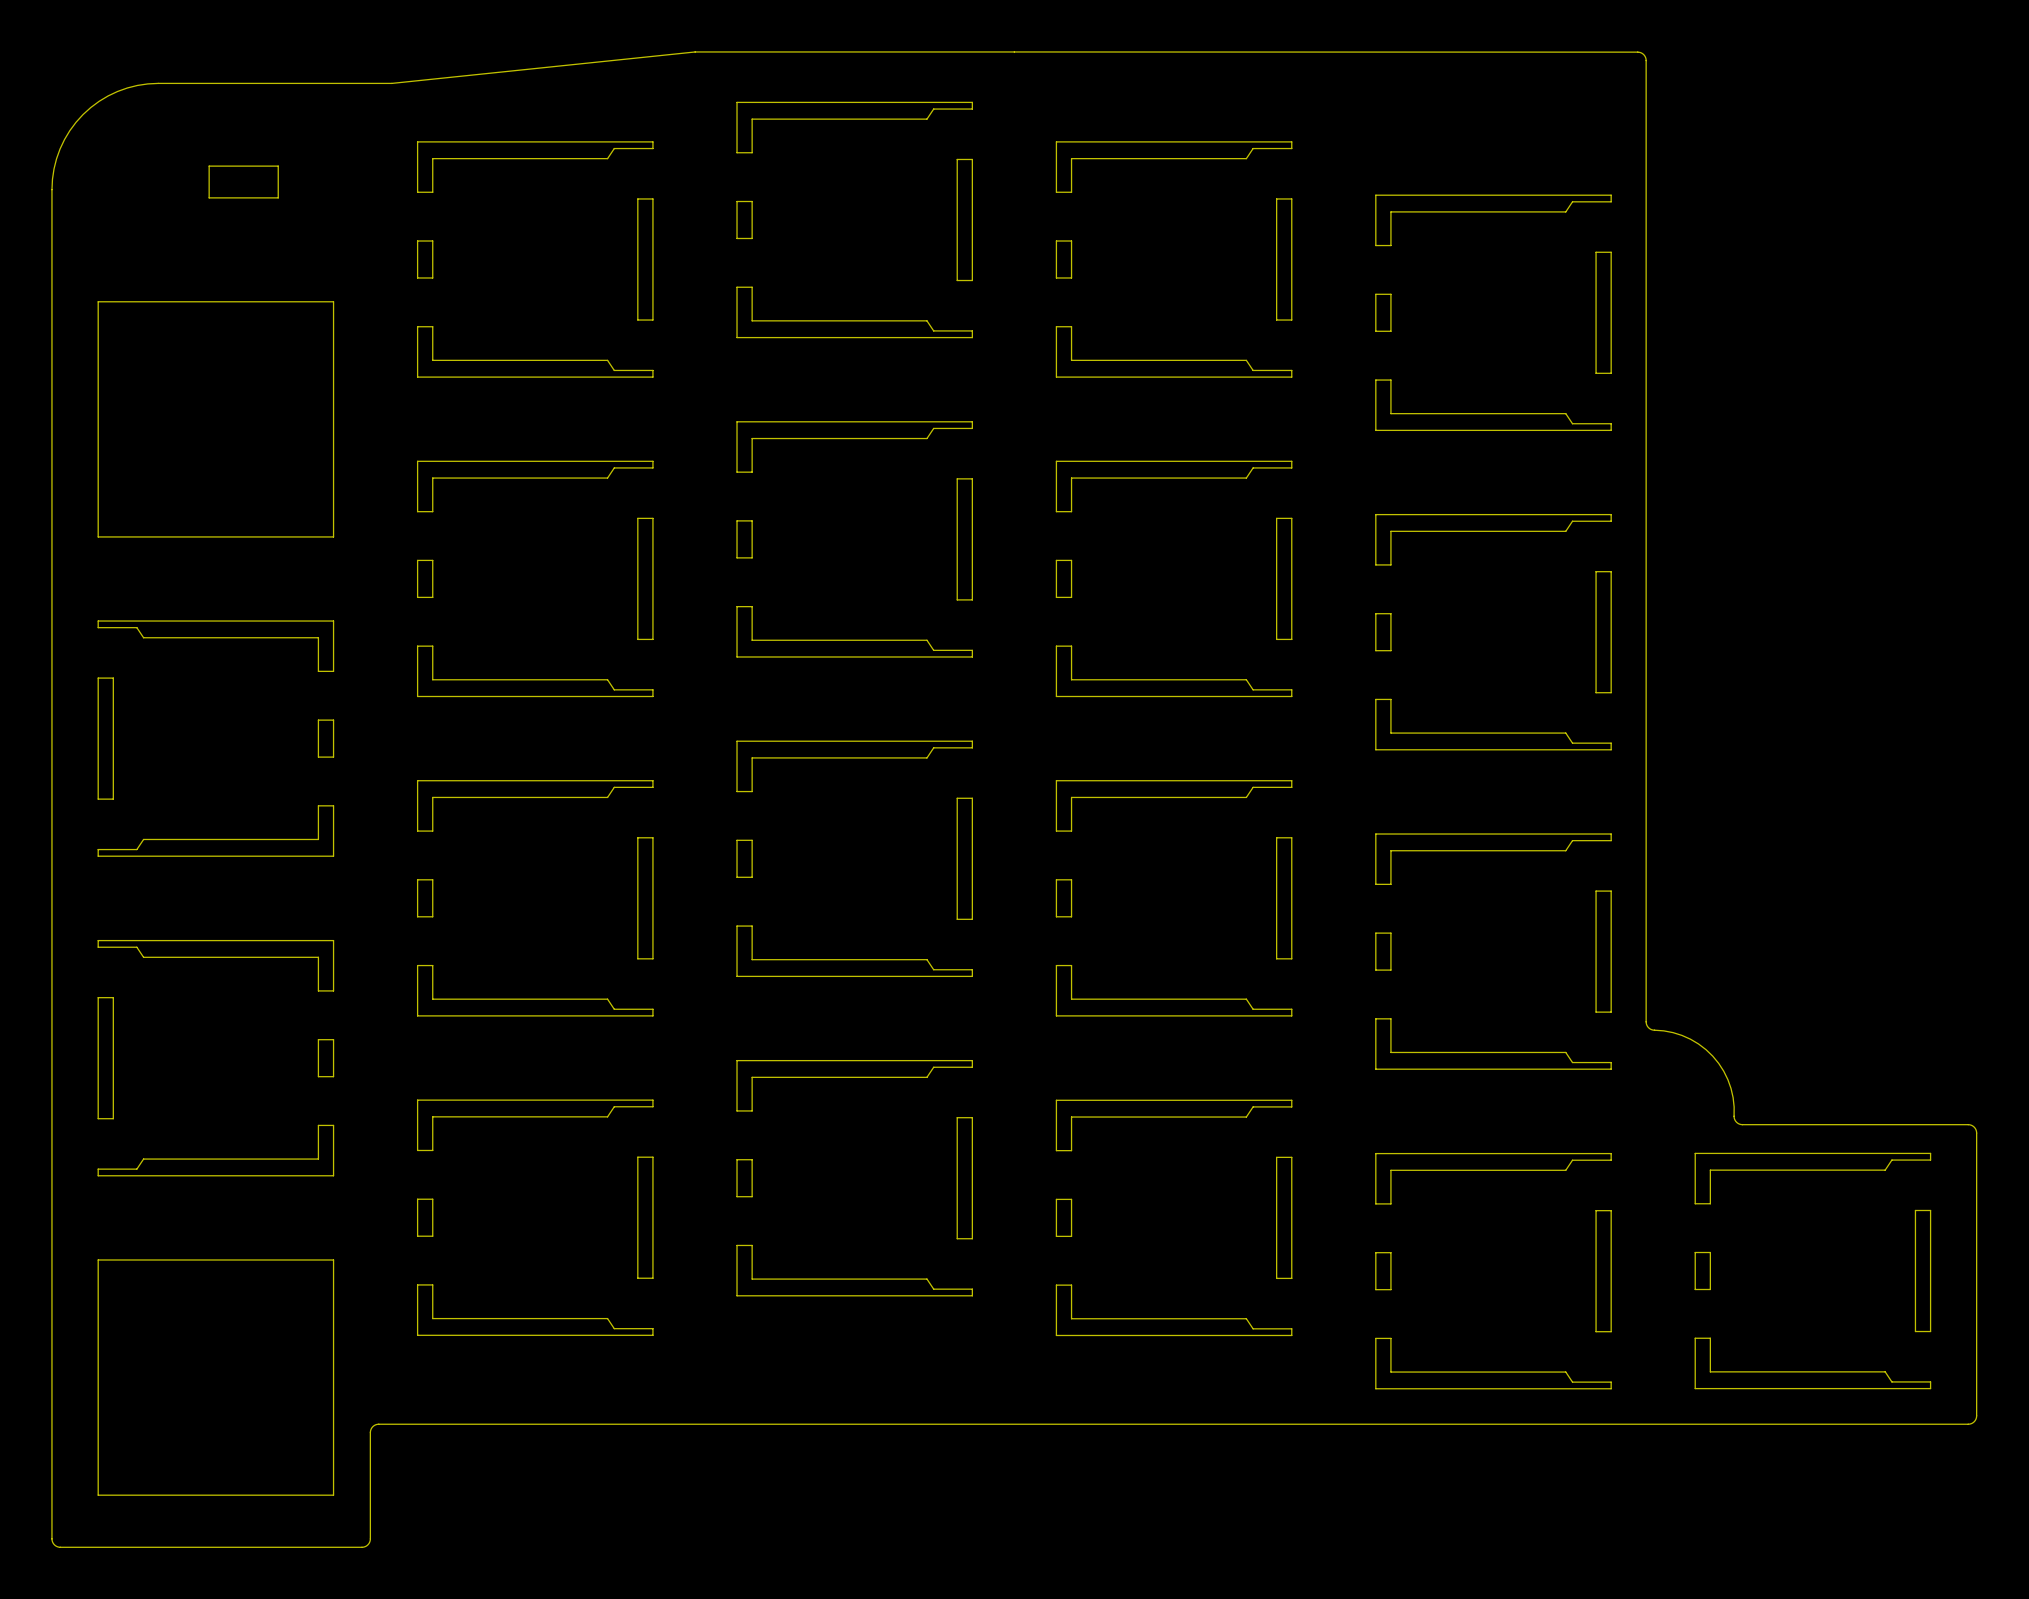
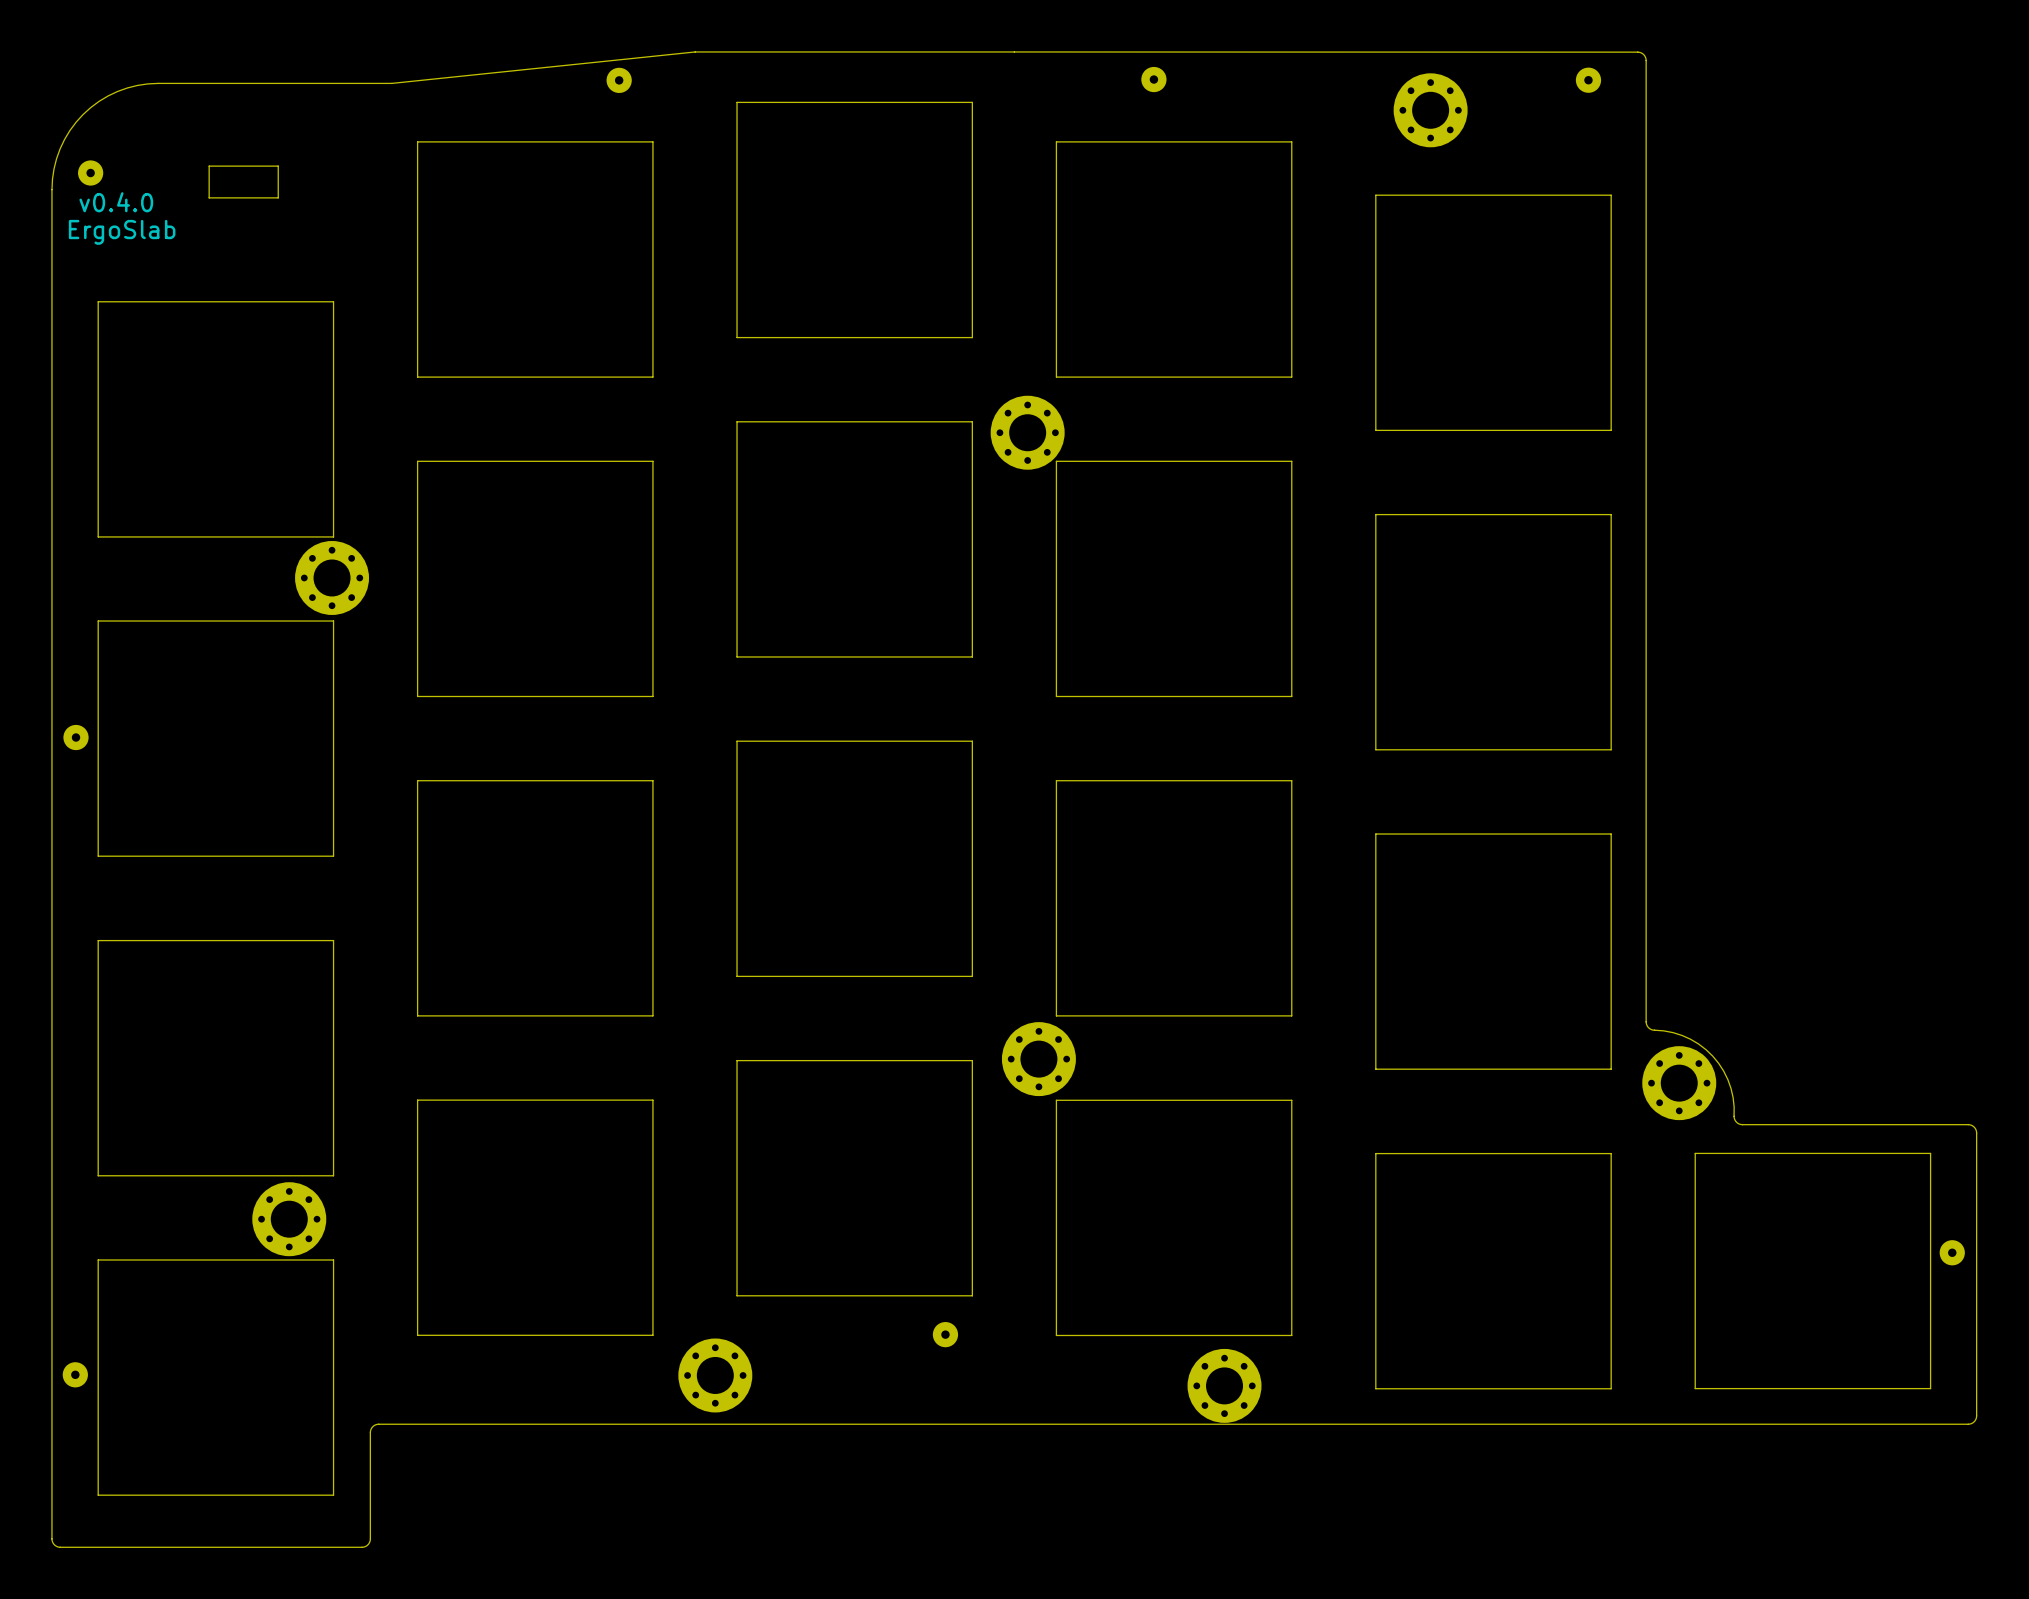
part: none -> (1153, 79)
part: none -> (619, 80)
part: none -> (1588, 80)
board edge: (972, 109) (933, 109) (926, 119) (752, 119) (752, 152) (737, 152) -> none
part: none -> (1430, 110)
board edge: (652, 148) (614, 148) (607, 158) (432, 158) (432, 192) (417, 192) -> none
board edge: (1291, 148) (1253, 148) (1246, 158) (1071, 158) (1071, 192) (1056, 192) -> none
board edge: (972, 159) (957, 159) (957, 280) (972, 280) -> (972, 159) (972, 109)
part: none -> (90, 173)
board edge: (652, 198) (637, 198) (637, 320) (652, 320) -> (652, 198) (652, 148)
board edge: (1291, 198) (1276, 198) (1276, 320) (1291, 320) -> (1291, 198) (1291, 148)
board edge: (737, 201) (752, 201) (752, 238) (737, 238) -> (737, 201) (737, 152)
board edge: (1611, 201) (1572, 201) (1565, 211) (1390, 211) (1390, 245) (1375, 245) -> none
text: none -> v0.4.0 (116, 202)
text: none -> ErgoSlab (122, 232)
board edge: none -> (737, 238) (737, 287)
board edge: (417, 241) (432, 241) (432, 277) (417, 277) -> (417, 241) (417, 192)
board edge: (1056, 241) (1071, 241) (1071, 277) (1056, 277) -> (1056, 241) (1056, 192)
board edge: (1611, 252) (1596, 252) (1596, 373) (1611, 373) -> (1611, 252) (1611, 201)
board edge: none -> (417, 277) (417, 326)
board edge: none -> (1056, 277) (1056, 326)
board edge: (737, 287) (752, 287) (752, 320) (926, 320) (933, 330) (972, 330) -> (972, 280) (972, 330)
board edge: (1375, 294) (1390, 294) (1390, 331) (1375, 331) -> (1375, 294) (1375, 245)
board edge: (417, 326) (432, 326) (432, 360) (607, 360) (614, 370) (652, 370) -> (652, 320) (652, 370)
board edge: (1056, 326) (1071, 326) (1071, 360) (1246, 360) (1253, 370) (1291, 370) -> (1291, 320) (1291, 370)
board edge: none -> (1375, 331) (1375, 380)
board edge: (1375, 380) (1390, 380) (1390, 413) (1565, 413) (1572, 423) (1611, 423) -> (1611, 373) (1611, 423)
board edge: (972, 428) (933, 428) (926, 438) (752, 438) (752, 472) (737, 472) -> (737, 520) (737, 472)
part: none -> (1027, 432)
board edge: (652, 467) (614, 467) (607, 478) (432, 478) (432, 511) (417, 511) -> none
board edge: (1291, 467) (1253, 467) (1246, 478) (1071, 478) (1071, 511) (1056, 511) -> none
board edge: (972, 478) (957, 478) (957, 599) (972, 599) -> (972, 478) (972, 428)
board edge: (652, 518) (637, 518) (637, 639) (652, 639) -> (652, 518) (652, 467)
board edge: (1291, 518) (1276, 518) (1276, 639) (1291, 639) -> (1291, 518) (1291, 467)
board edge: (737, 520) (752, 520) (752, 557) (737, 557) -> (737, 606) (737, 557)
board edge: (1611, 521) (1572, 521) (1565, 531) (1390, 531) (1390, 564) (1375, 564) -> none
board edge: (417, 560) (432, 560) (432, 597) (417, 597) -> (417, 560) (417, 511)
board edge: (1056, 560) (1071, 560) (1071, 597) (1056, 597) -> (1056, 560) (1056, 511)
board edge: (1611, 571) (1596, 571) (1596, 692) (1611, 692) -> (1611, 571) (1611, 521)
part: none -> (332, 577)
board edge: none -> (417, 597) (417, 646)
board edge: none -> (1056, 597) (1056, 646)
board edge: (737, 606) (752, 606) (752, 640) (926, 640) (933, 650) (972, 650) -> (972, 599) (972, 650)
board edge: (1375, 613) (1390, 613) (1390, 650) (1375, 650) -> (1375, 613) (1375, 564)
board edge: (98, 627) (136, 627) (143, 637) (318, 637) (318, 671) (333, 671) -> none
board edge: (417, 646) (432, 646) (432, 679) (607, 679) (614, 689) (652, 689) -> (652, 639) (652, 689)
board edge: (1056, 646) (1071, 646) (1071, 679) (1246, 679) (1253, 689) (1291, 689) -> (1291, 639) (1291, 689)
board edge: none -> (1375, 650) (1375, 699)
board edge: (98, 678) (113, 678) (113, 799) (98, 799) -> (98, 678) (98, 627)
board edge: (1375, 699) (1390, 699) (1390, 733) (1565, 733) (1572, 743) (1611, 743) -> (1611, 692) (1611, 743)
board edge: (333, 720) (318, 720) (318, 757) (333, 757) -> (333, 720) (333, 671)
part: none -> (76, 737)
board edge: (972, 747) (933, 747) (926, 757) (752, 757) (752, 791) (737, 791) -> (737, 840) (737, 791)
board edge: none -> (333, 757) (333, 805)
board edge: (652, 787) (614, 787) (607, 797) (432, 797) (432, 831) (417, 831) -> none
board edge: (1291, 787) (1253, 787) (1246, 797) (1071, 797) (1071, 831) (1056, 831) -> none
board edge: (972, 798) (957, 798) (957, 919) (972, 919) -> (972, 798) (972, 747)
board edge: (333, 805) (318, 805) (318, 839) (143, 839) (136, 849) (98, 849) -> (98, 799) (98, 849)
board edge: (652, 837) (637, 837) (637, 958) (652, 958) -> (652, 837) (652, 787)
board edge: (1291, 837) (1276, 837) (1276, 958) (1291, 958) -> (1291, 837) (1291, 787)
board edge: (737, 840) (752, 840) (752, 877) (737, 877) -> (737, 926) (737, 877)
board edge: (1611, 840) (1572, 840) (1565, 850) (1390, 850) (1390, 884) (1375, 884) -> none
board edge: (417, 879) (432, 879) (432, 916) (417, 916) -> (417, 879) (417, 831)
board edge: (1056, 879) (1071, 879) (1071, 916) (1056, 916) -> (1056, 879) (1056, 831)
board edge: (1611, 891) (1596, 891) (1596, 1012) (1611, 1012) -> (1611, 891) (1611, 840)
board edge: none -> (417, 916) (417, 965)
board edge: none -> (1056, 916) (1056, 965)
board edge: (737, 926) (752, 926) (752, 959) (926, 959) (933, 969) (972, 969) -> (972, 919) (972, 969)
board edge: (1375, 933) (1390, 933) (1390, 970) (1375, 970) -> (1375, 933) (1375, 884)
board edge: (98, 947) (136, 947) (143, 957) (318, 957) (318, 990) (333, 990) -> none
board edge: (417, 965) (432, 965) (432, 999) (607, 999) (614, 1009) (652, 1009) -> (652, 958) (652, 1009)
board edge: (1056, 965) (1071, 965) (1071, 999) (1246, 999) (1253, 1009) (1291, 1009) -> (1291, 958) (1291, 1009)
board edge: none -> (1375, 970) (1375, 1018)
board edge: (98, 997) (113, 997) (113, 1118) (98, 1118) -> (98, 997) (98, 947)
board edge: (1375, 1018) (1390, 1018) (1390, 1052) (1565, 1052) (1572, 1062) (1611, 1062) -> (1611, 1012) (1611, 1062)
board edge: (333, 1039) (318, 1039) (318, 1076) (333, 1076) -> (333, 1039) (333, 990)
part: none -> (1038, 1059)
board edge: (972, 1067) (933, 1067) (926, 1077) (752, 1077) (752, 1110) (737, 1110) -> (737, 1159) (737, 1110)
board edge: none -> (333, 1076) (333, 1125)
part: none -> (1679, 1083)
board edge: (652, 1106) (614, 1106) (607, 1116) (432, 1116) (432, 1150) (417, 1150) -> none
board edge: (1291, 1106) (1253, 1106) (1246, 1117) (1071, 1117) (1071, 1150) (1056, 1150) -> none
board edge: (972, 1117) (957, 1117) (957, 1238) (972, 1238) -> (972, 1117) (972, 1067)
board edge: (333, 1125) (318, 1125) (318, 1159) (143, 1159) (136, 1169) (98, 1169) -> (98, 1118) (98, 1169)
board edge: (652, 1157) (637, 1157) (637, 1278) (652, 1278) -> (652, 1157) (652, 1106)
board edge: (1291, 1157) (1276, 1157) (1276, 1278) (1291, 1278) -> (1291, 1157) (1291, 1106)
board edge: (737, 1159) (752, 1159) (752, 1196) (737, 1196) -> (737, 1245) (737, 1196)
board edge: (1611, 1160) (1572, 1160) (1565, 1170) (1390, 1170) (1390, 1203) (1375, 1203) -> (1375, 1252) (1375, 1203)
board edge: (1930, 1160) (1891, 1160) (1885, 1170) (1710, 1170) (1710, 1203) (1695, 1203) -> none
board edge: (417, 1199) (432, 1199) (432, 1236) (417, 1236) -> (417, 1199) (417, 1150)
board edge: (1056, 1199) (1071, 1199) (1071, 1236) (1056, 1236) -> (1056, 1199) (1056, 1150)
board edge: (1611, 1210) (1596, 1210) (1596, 1331) (1611, 1331) -> (1611, 1210) (1611, 1160)
board edge: (1930, 1210) (1915, 1210) (1915, 1331) (1930, 1331) -> (1930, 1210) (1930, 1160)
part: none -> (289, 1219)
board edge: none -> (417, 1236) (417, 1284)
board edge: none -> (1056, 1236) (1056, 1285)
board edge: (737, 1245) (752, 1245) (752, 1279) (926, 1279) (933, 1289) (972, 1289) -> (972, 1238) (972, 1289)
board edge: (1375, 1252) (1390, 1252) (1390, 1289) (1375, 1289) -> (1375, 1338) (1375, 1289)
board edge: (1695, 1252) (1710, 1252) (1710, 1289) (1695, 1289) -> (1695, 1252) (1695, 1203)
part: none -> (1952, 1252)
board edge: (417, 1284) (432, 1284) (432, 1318) (607, 1318) (614, 1328) (652, 1328) -> (652, 1278) (652, 1328)
board edge: (1056, 1285) (1071, 1285) (1071, 1318) (1246, 1318) (1253, 1328) (1291, 1328) -> (1291, 1278) (1291, 1328)
board edge: none -> (1695, 1289) (1695, 1338)
part: none -> (945, 1334)
board edge: (1375, 1338) (1390, 1338) (1390, 1372) (1565, 1372) (1572, 1382) (1611, 1382) -> (1611, 1331) (1611, 1382)
board edge: (1695, 1338) (1710, 1338) (1710, 1371) (1885, 1371) (1891, 1381) (1930, 1381) -> (1930, 1331) (1930, 1381)
part: none -> (75, 1374)
part: none -> (715, 1375)
part: none -> (1224, 1385)

